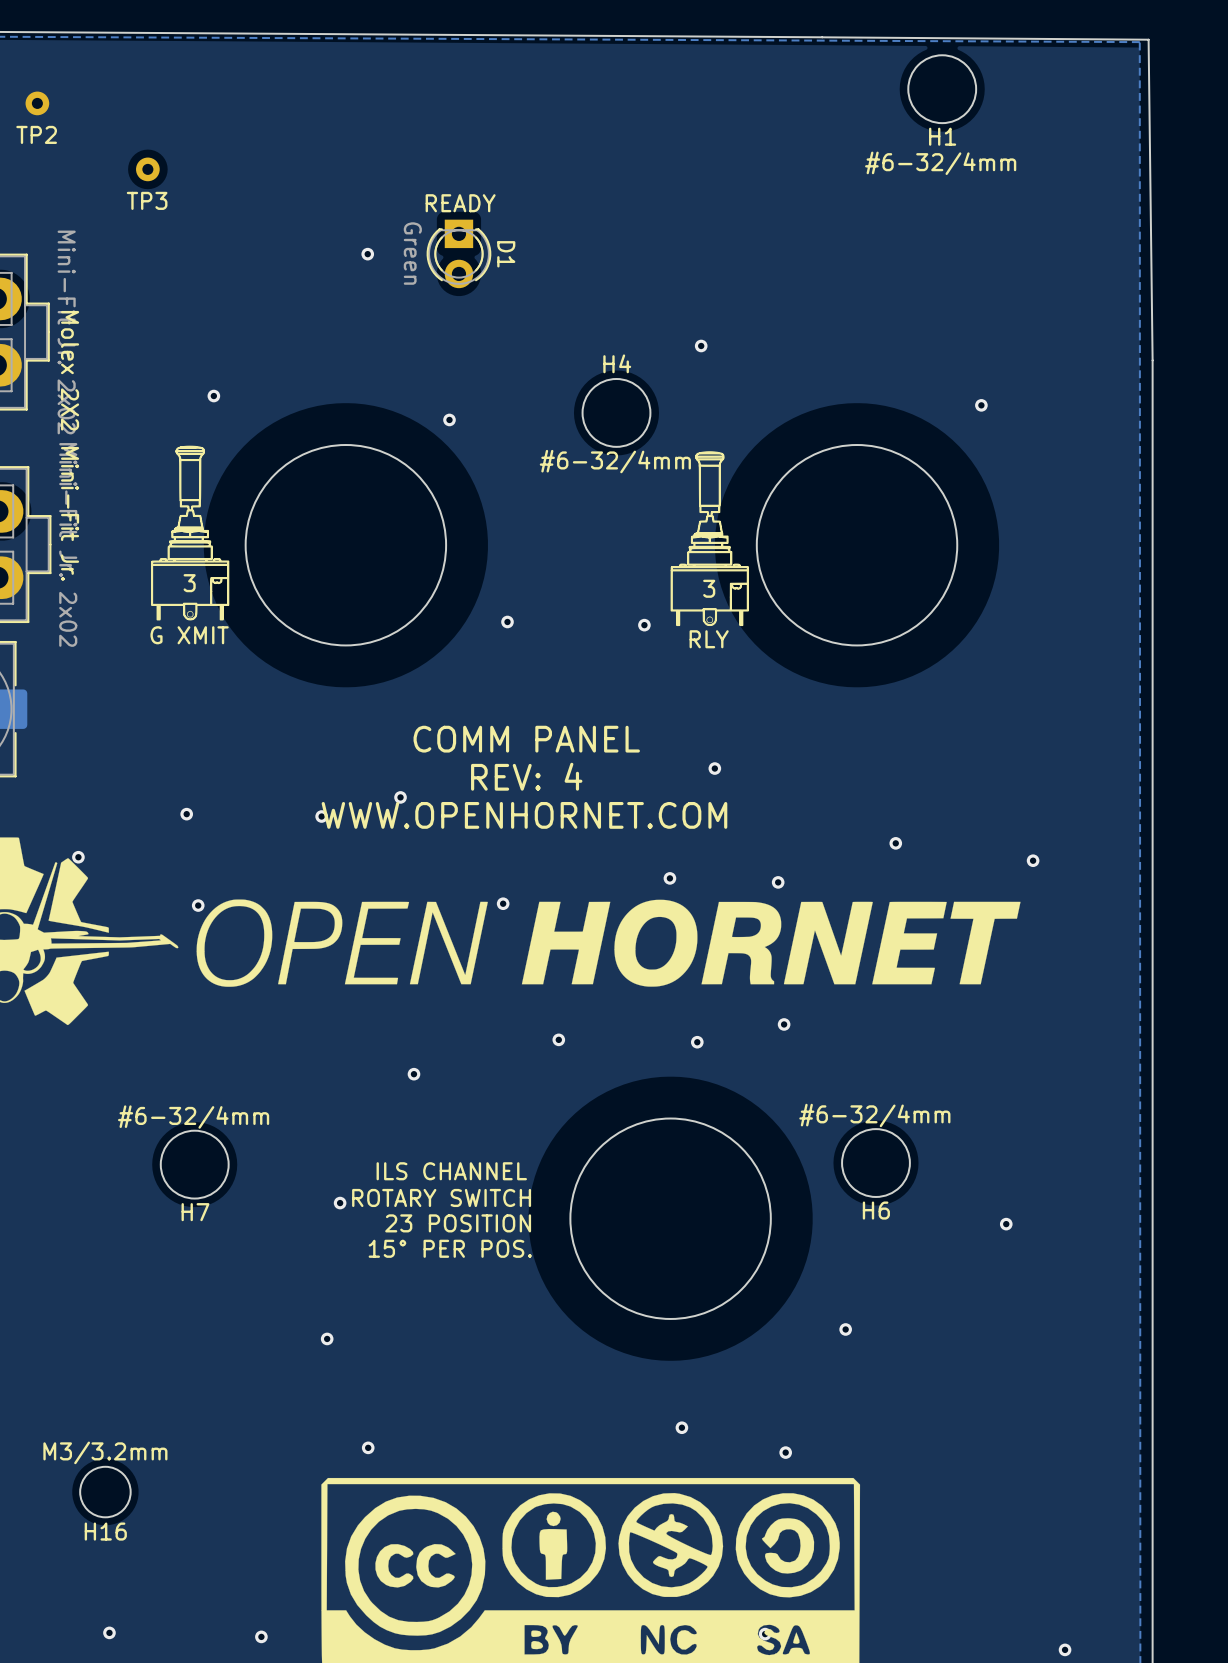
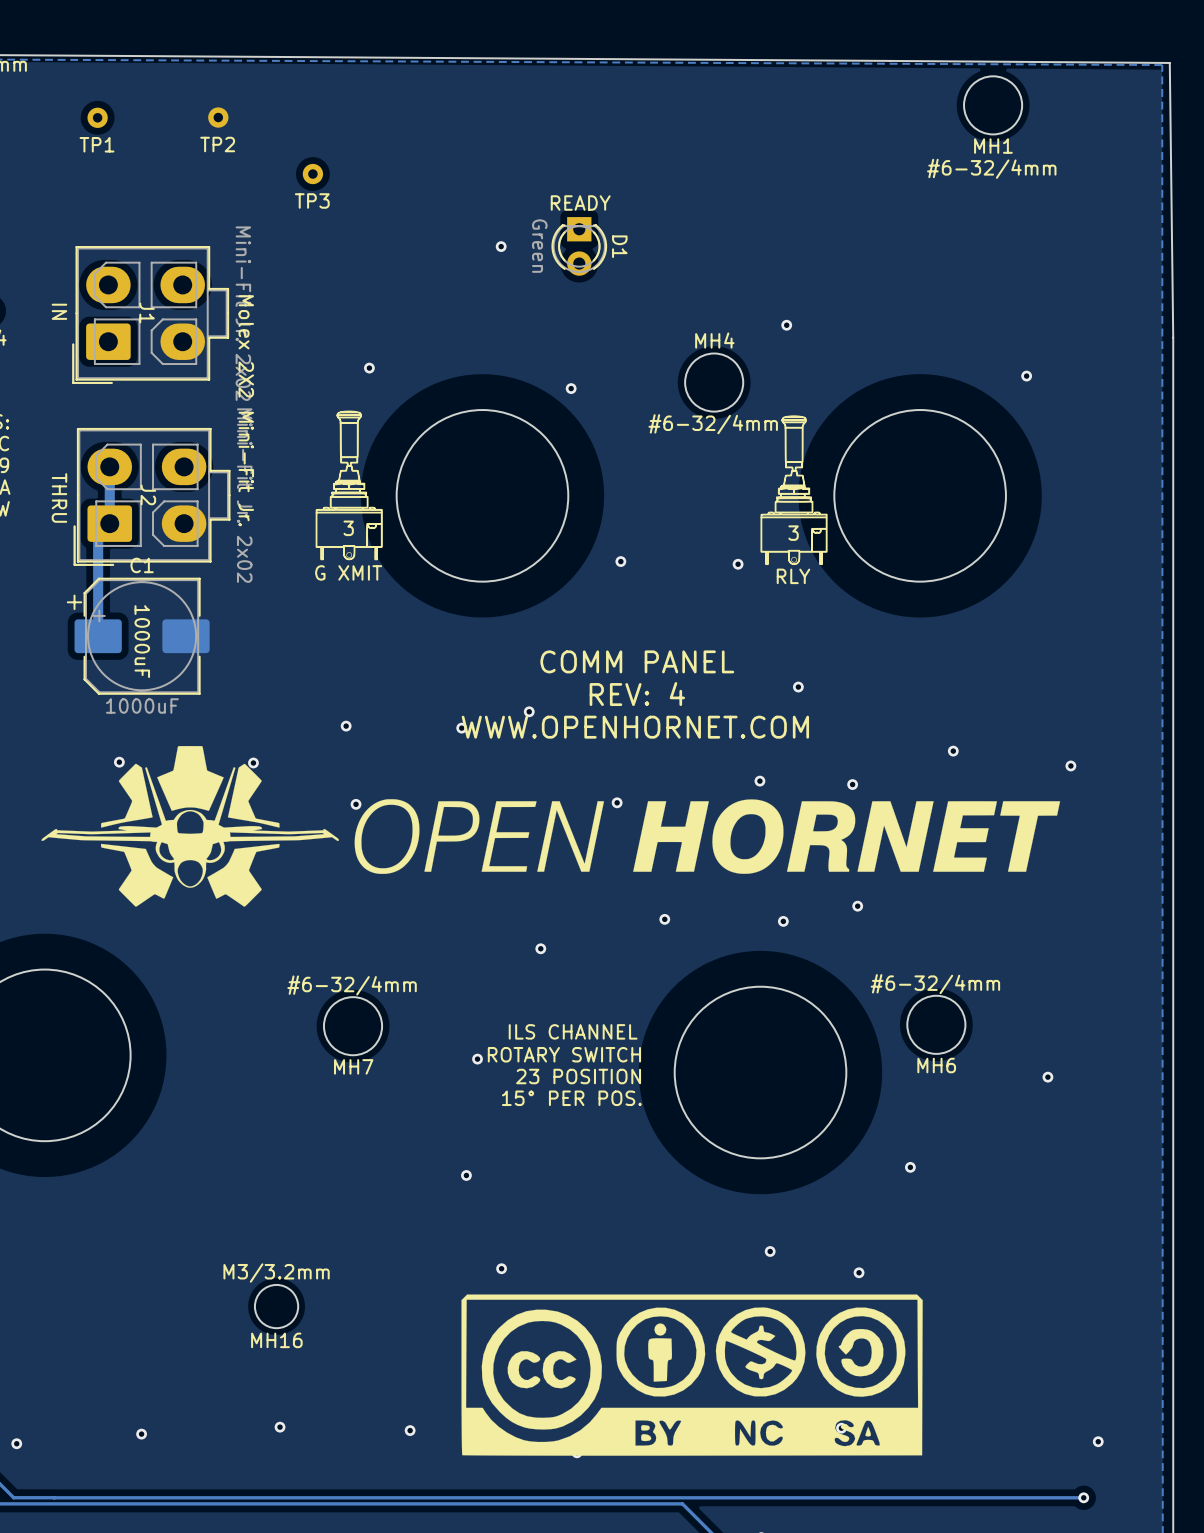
H1 name: H1 (942, 136) -> MH1 (993, 146)
H4 name: H4 (617, 363) -> MH4 (714, 340)
H6 name: H6 (876, 1210) -> MH6 (936, 1065)
H7 name: H7 (195, 1212) -> MH7 (353, 1066)
H16 name: H16 (105, 1531) -> MH16 (276, 1340)

